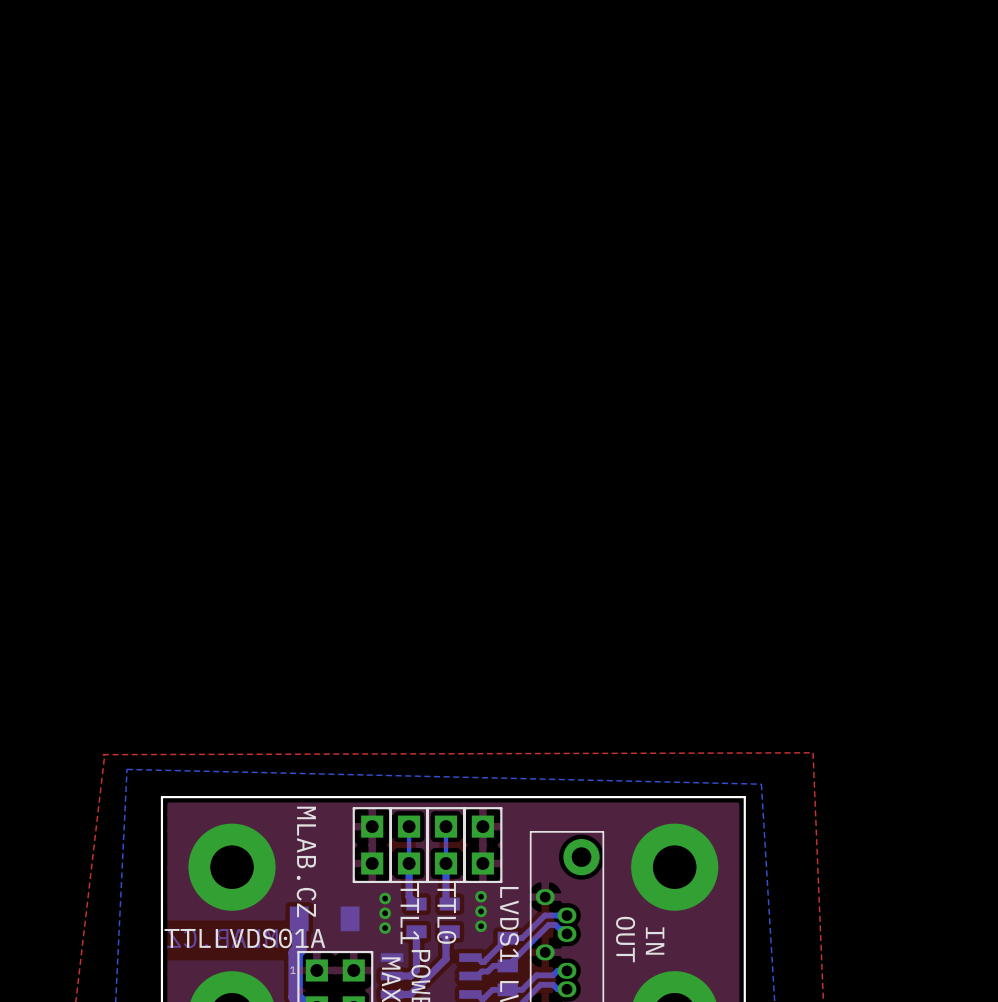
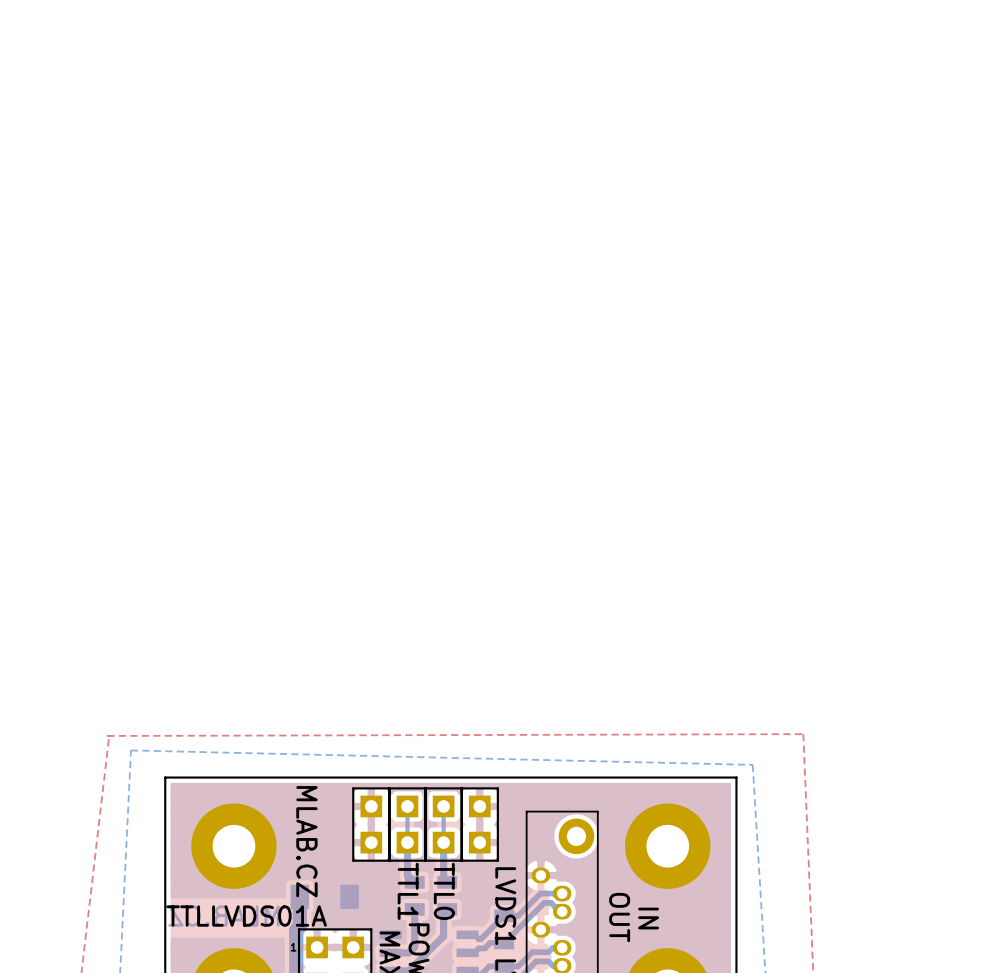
via: (481, 896) -> none
via: (385, 898) -> none
via: (481, 911) -> none
via: (385, 913) -> none
via: (481, 926) -> none
via: (385, 928) -> none

